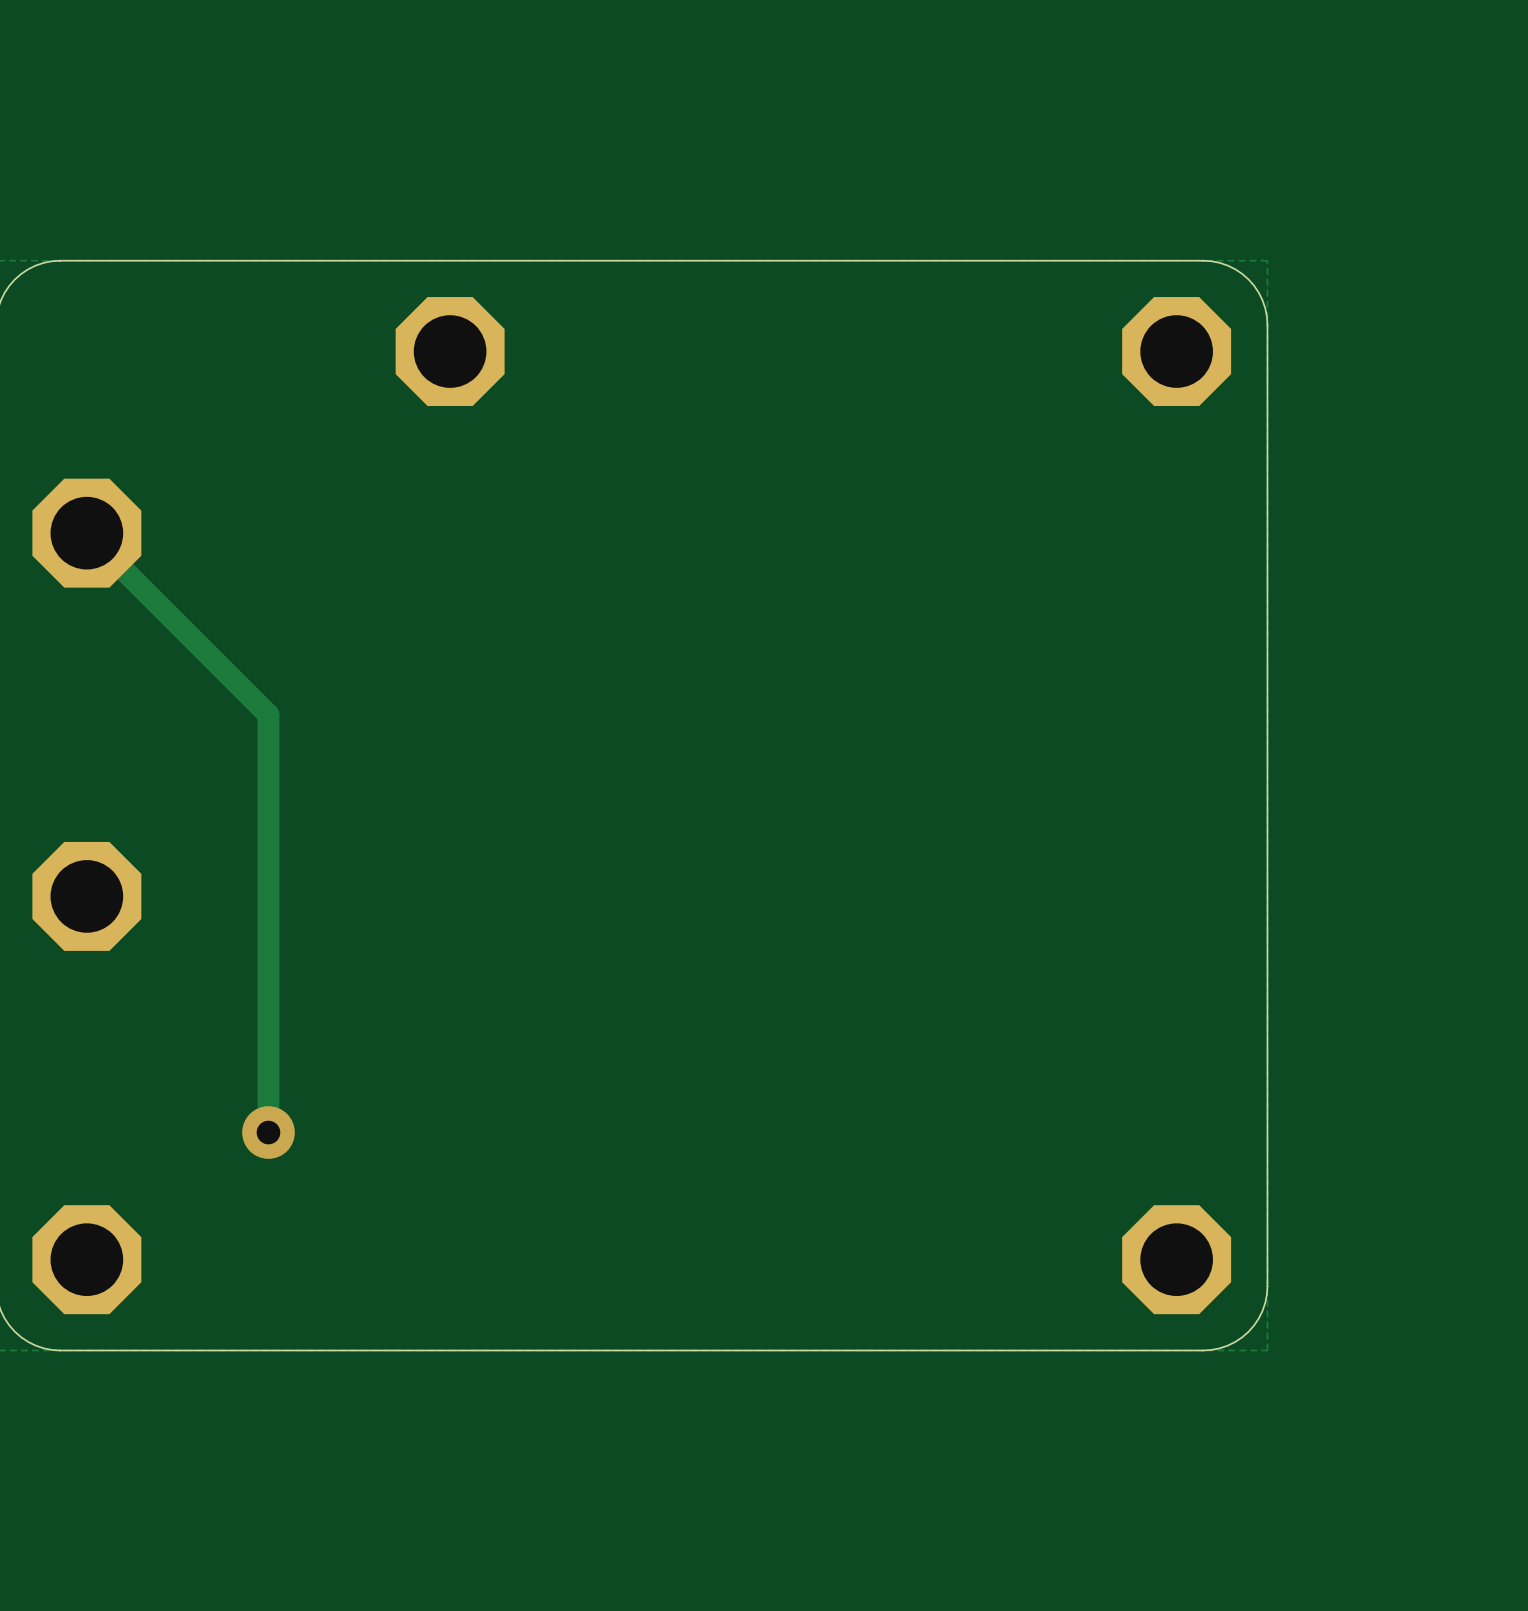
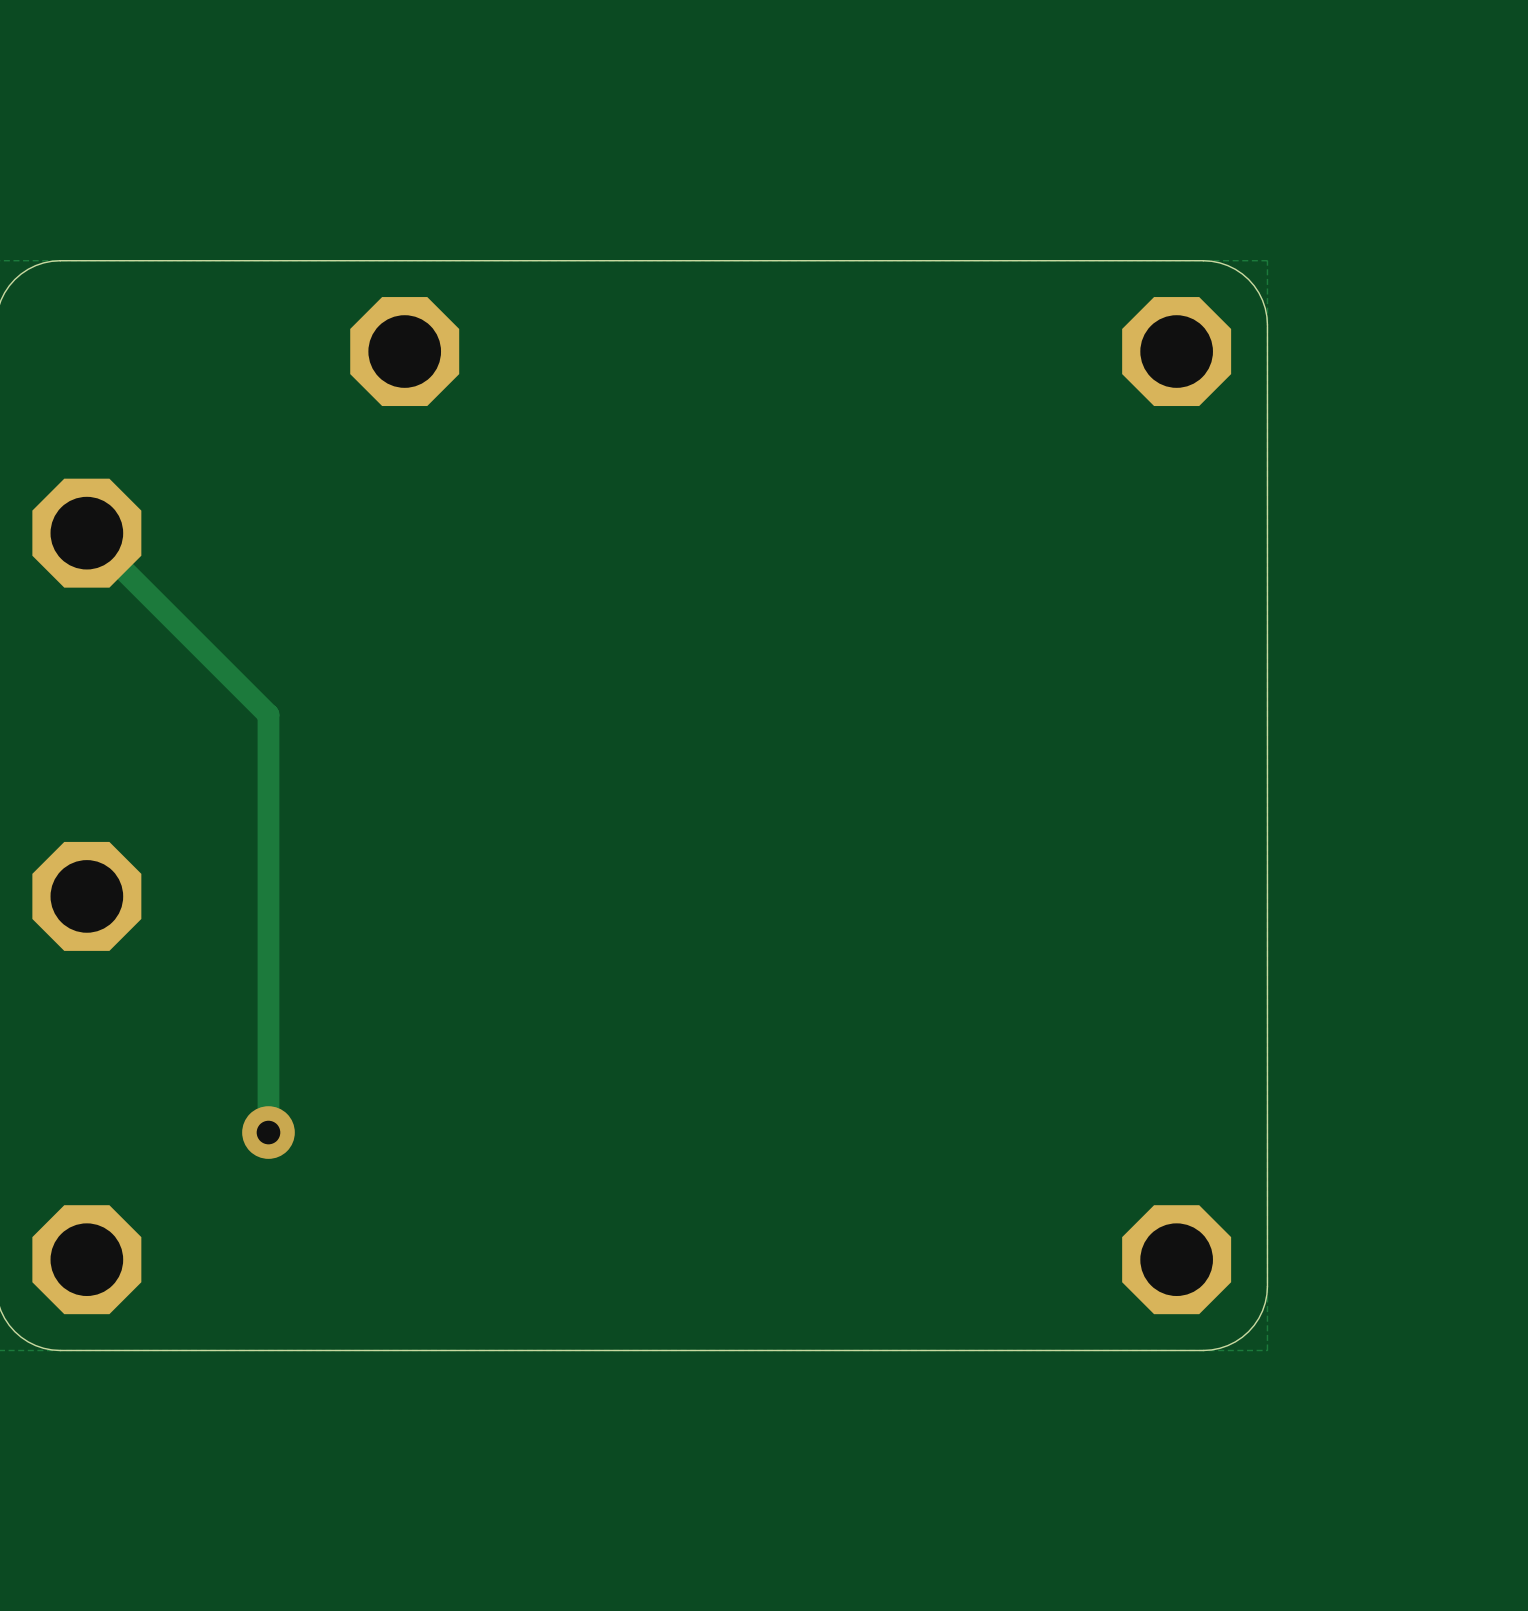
part position: (450, 351) -> (404, 351)

